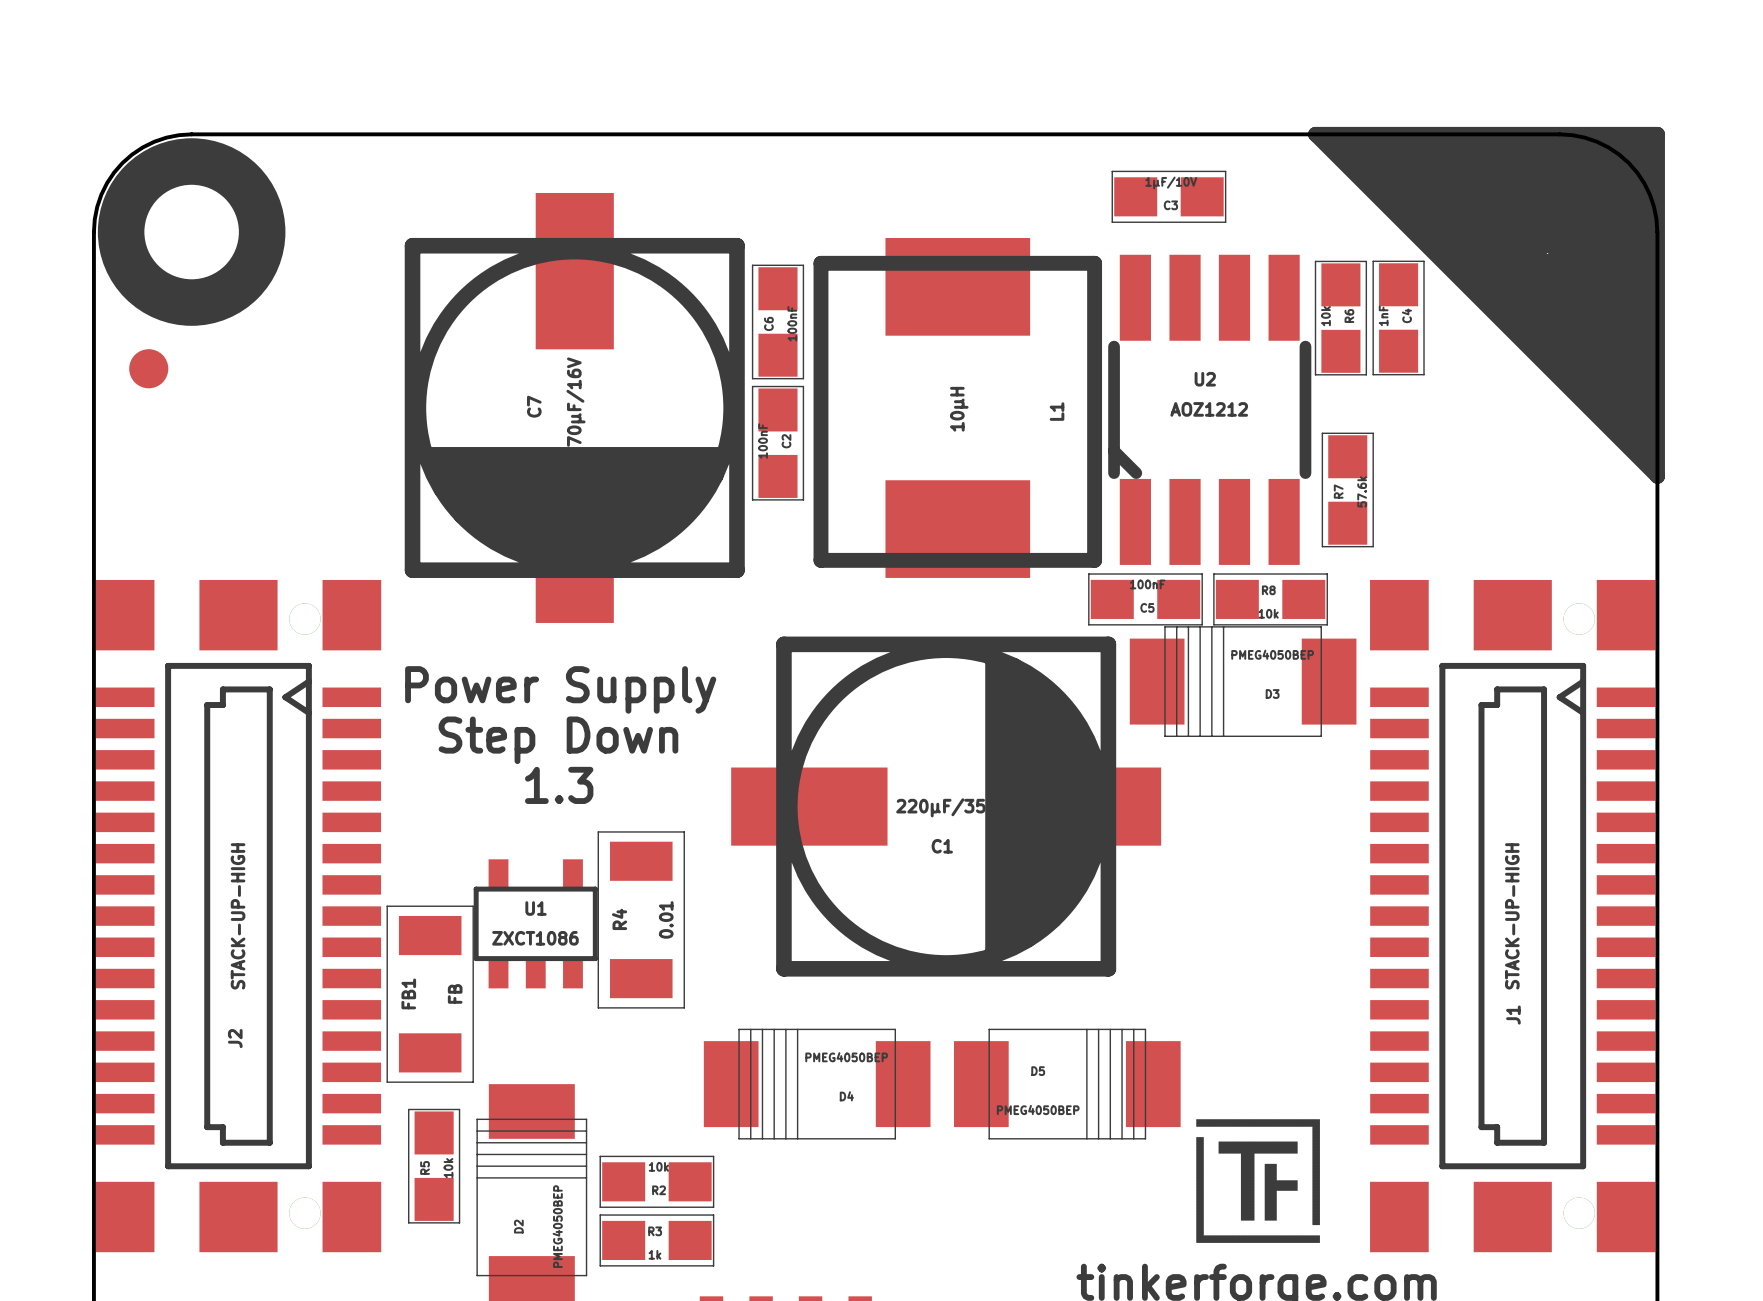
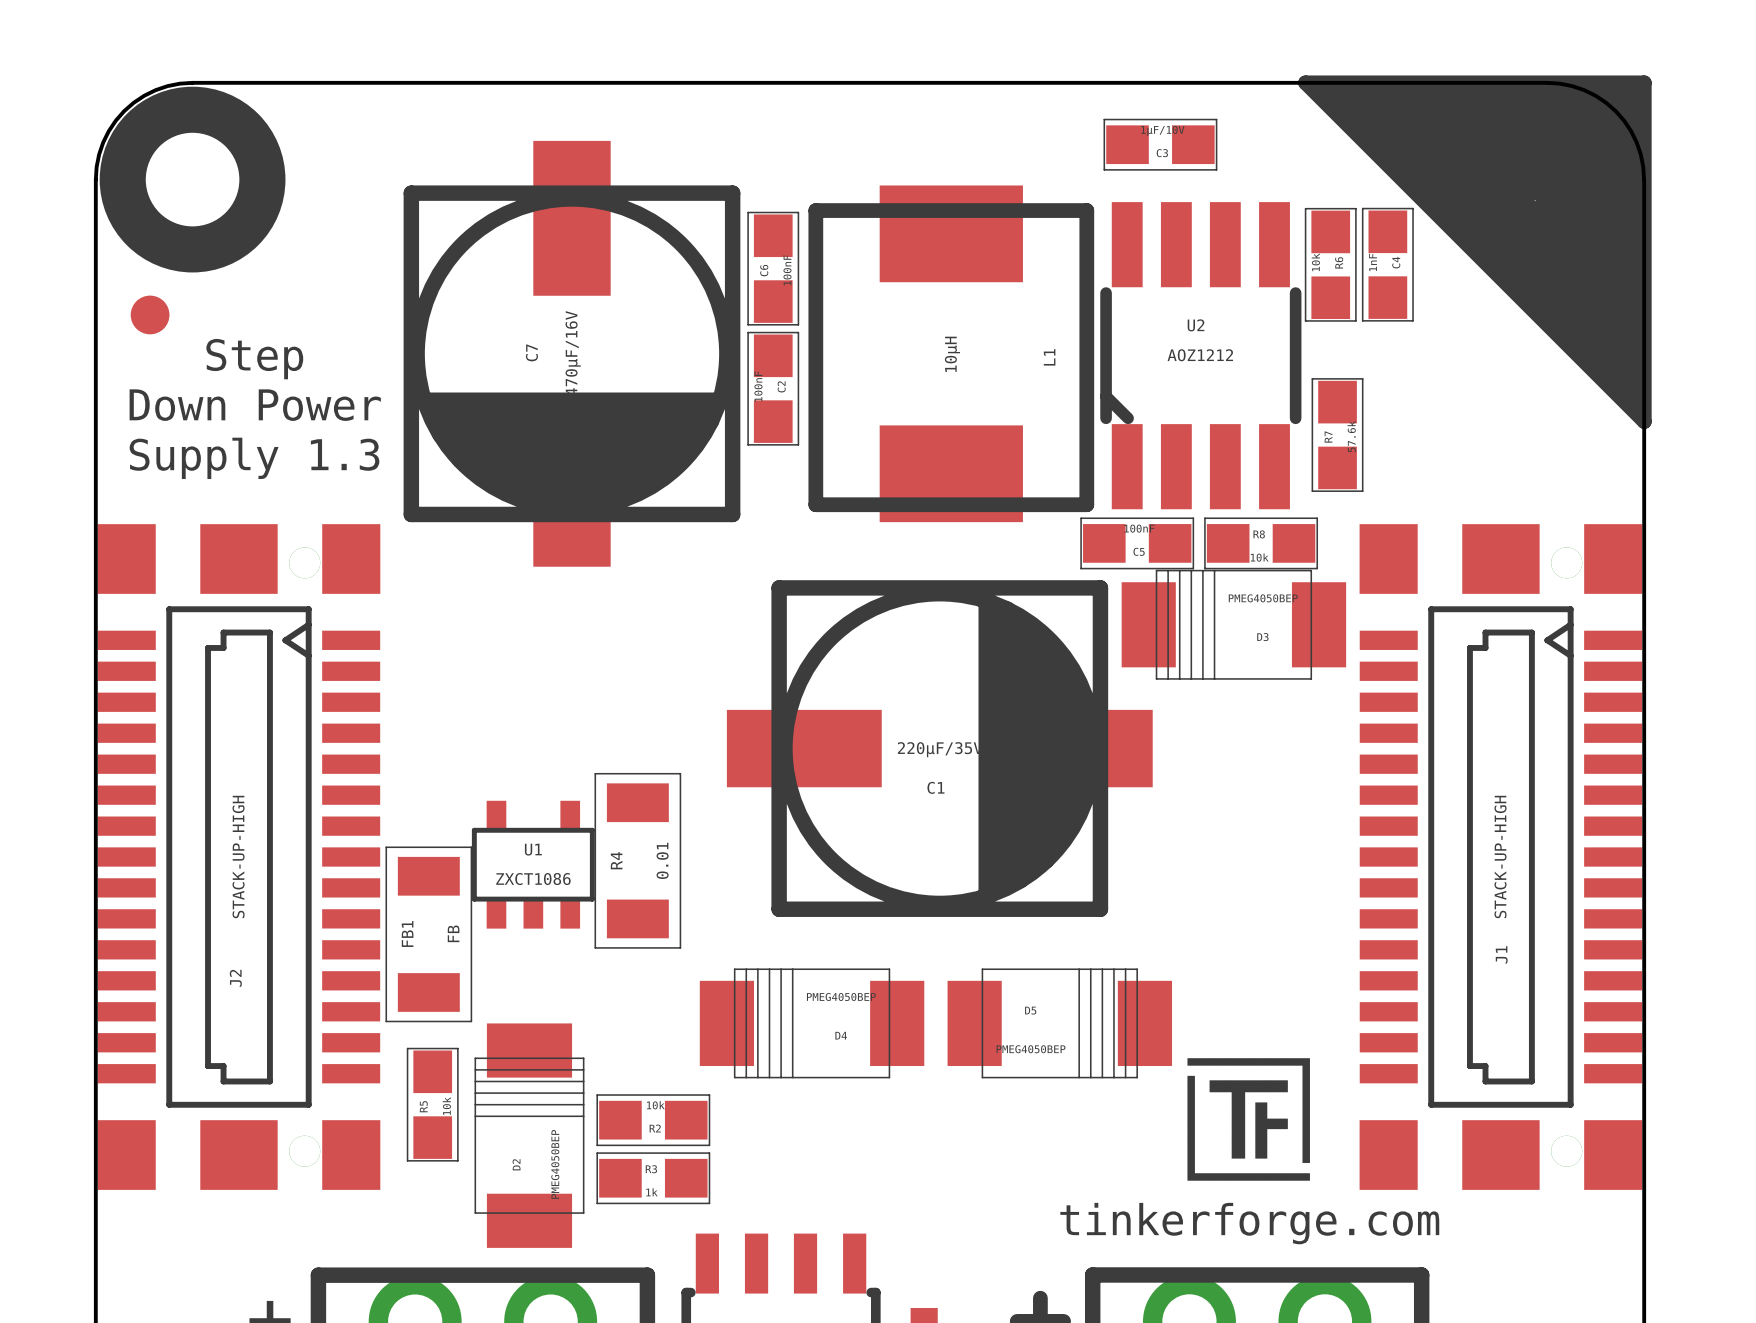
text: none -> Step (254, 359)
text: none -> Down Power (255, 405)
text: none -> Supply 1.3 (254, 458)
text: Power Supply (560, 689) -> none
text: Step Down (558, 740) -> none
text: 1.3 (559, 785) -> none

